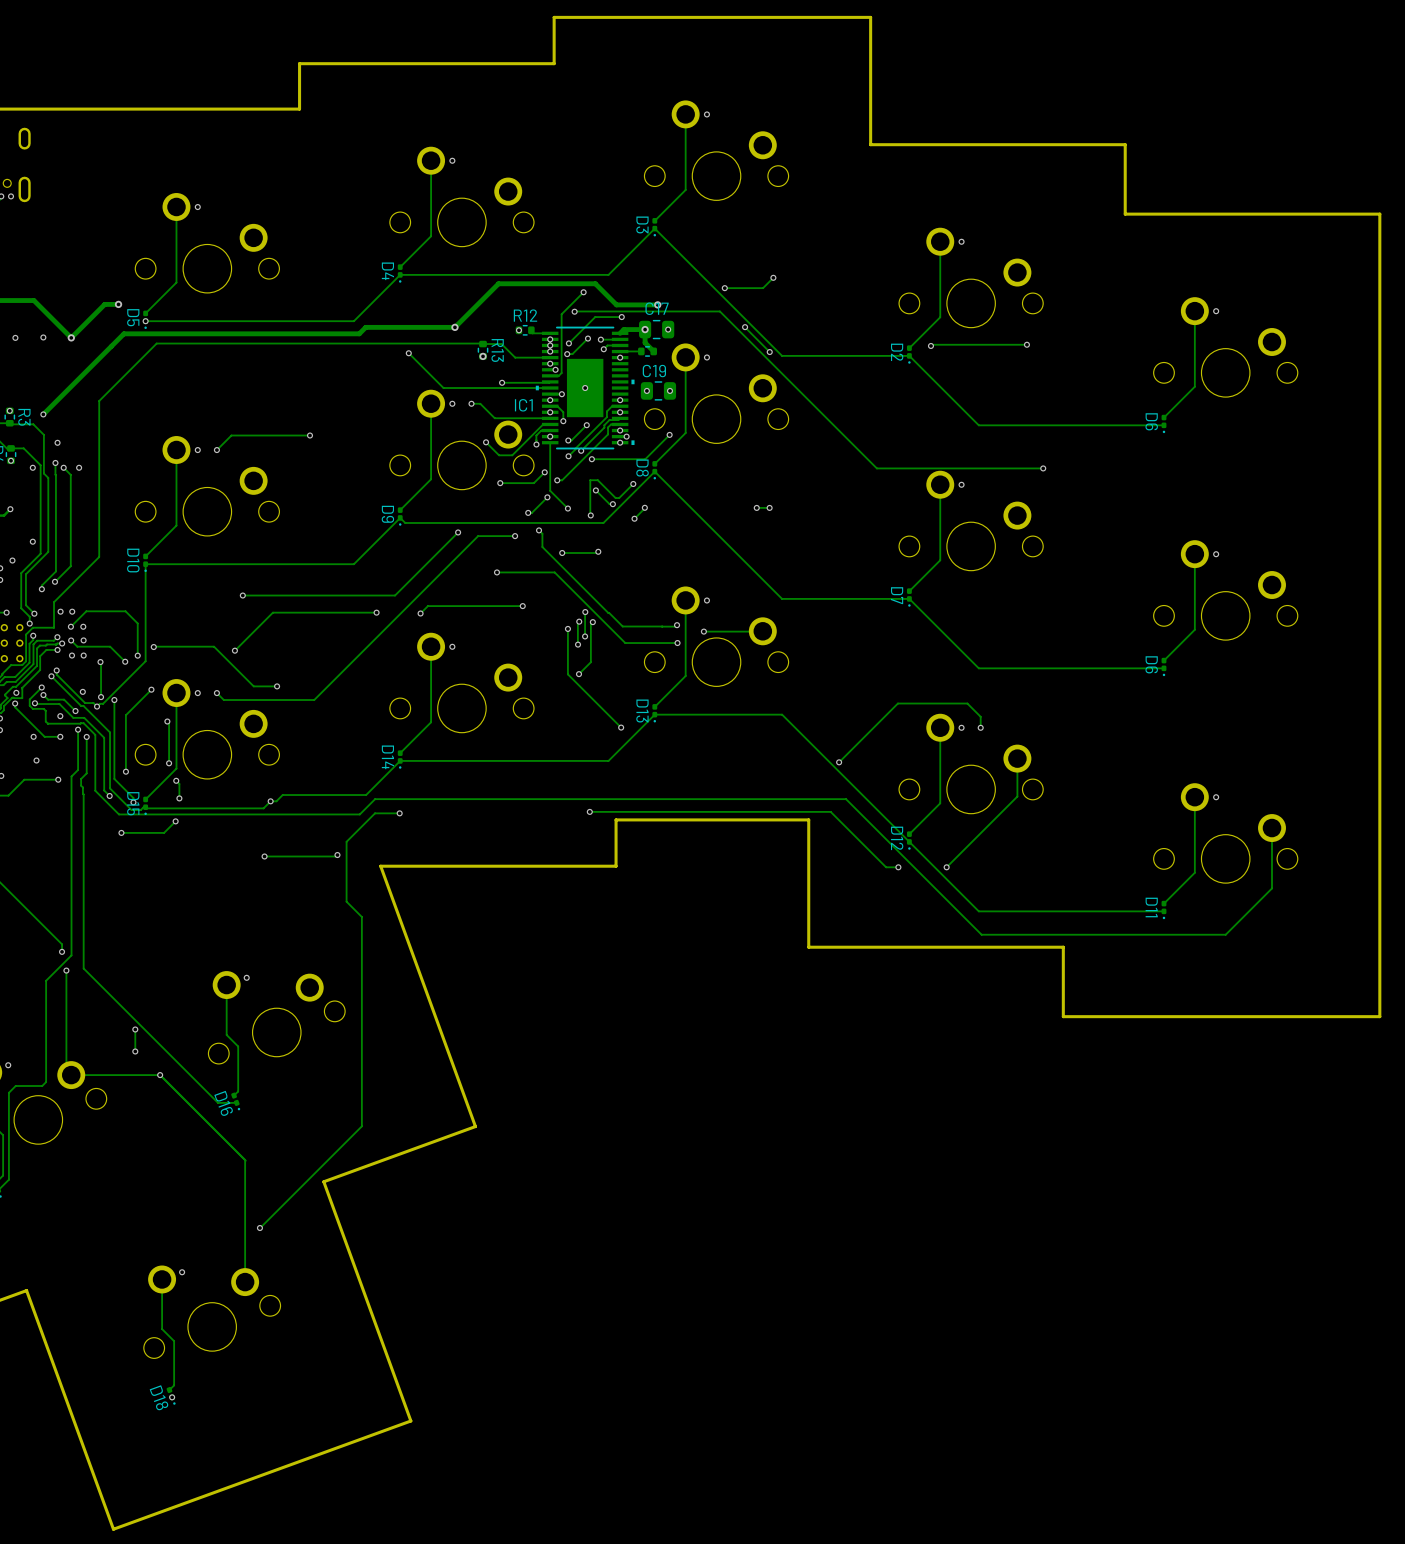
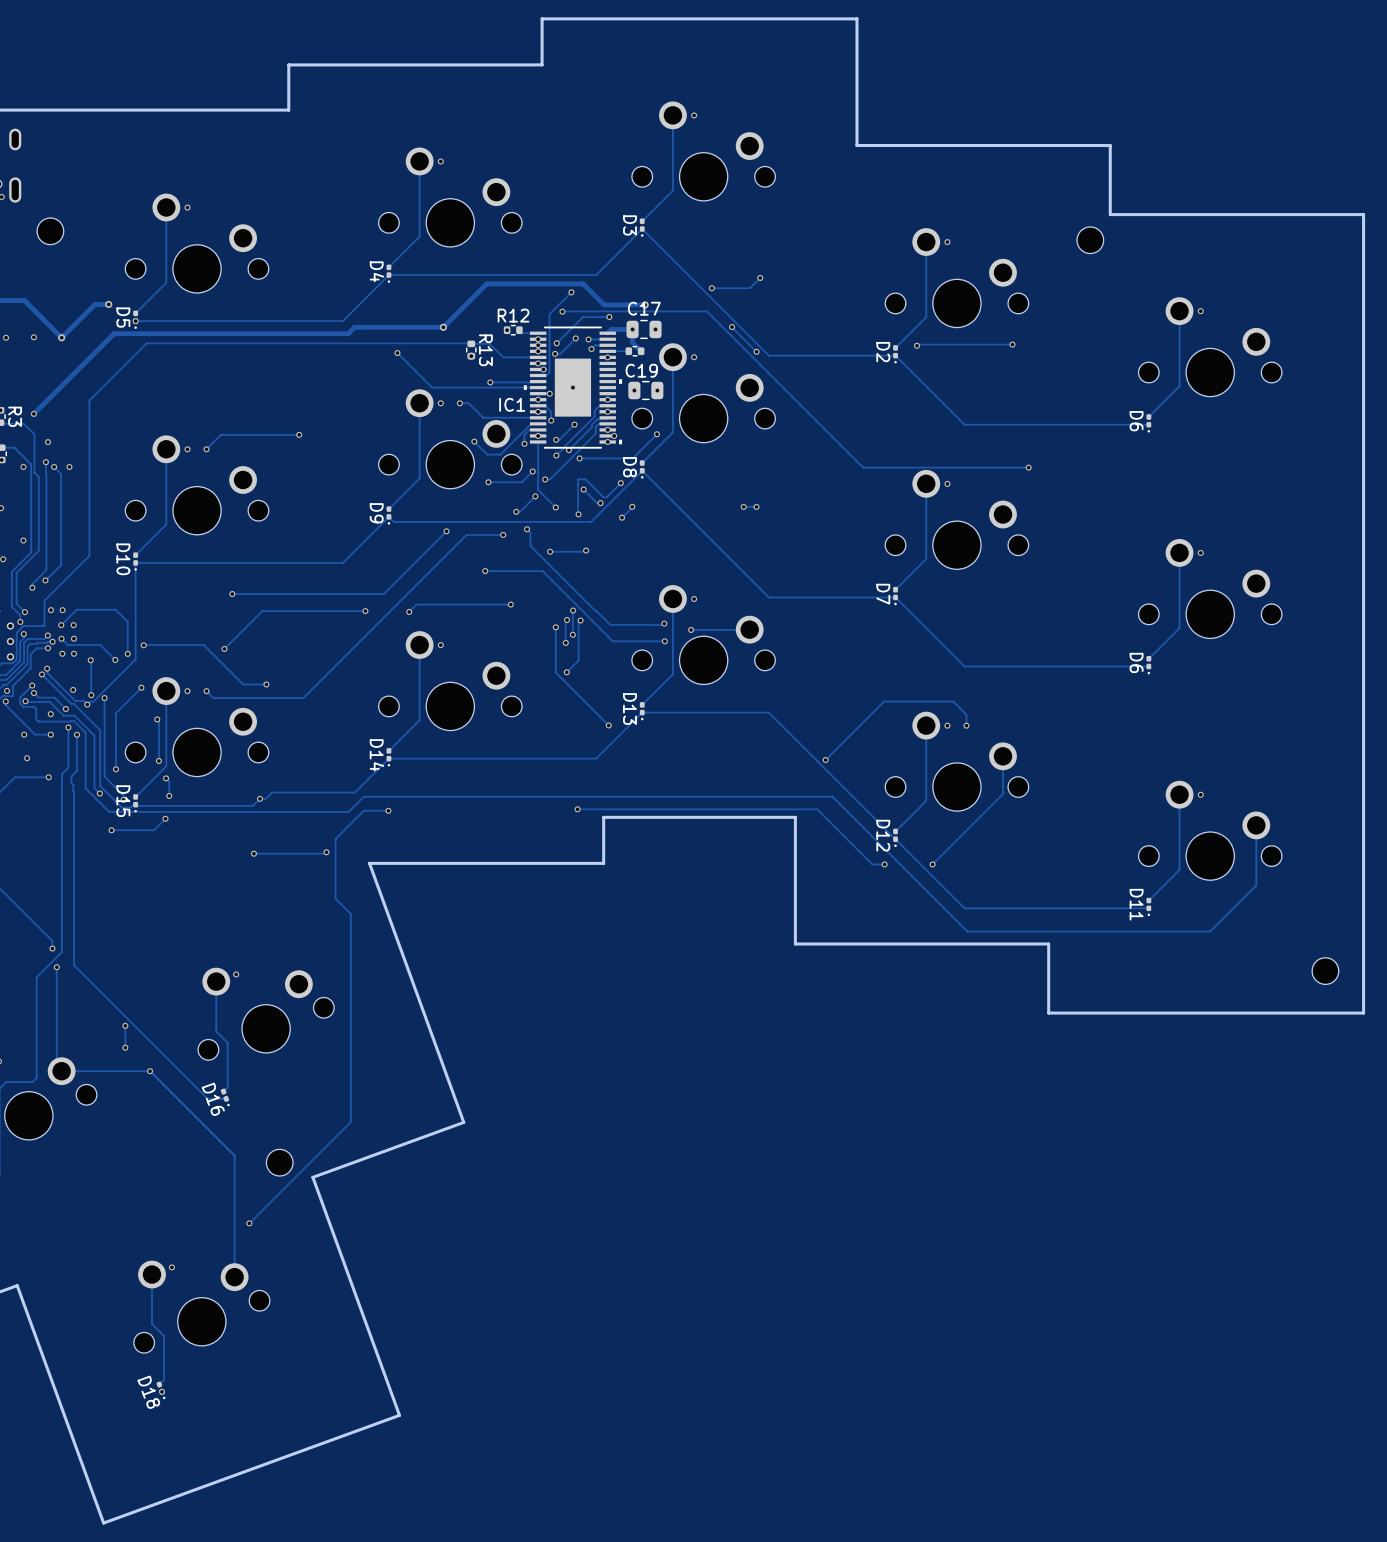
part: none -> (50, 231)
part: none -> (1090, 240)
part: none -> (1325, 971)
part: none -> (279, 1162)

